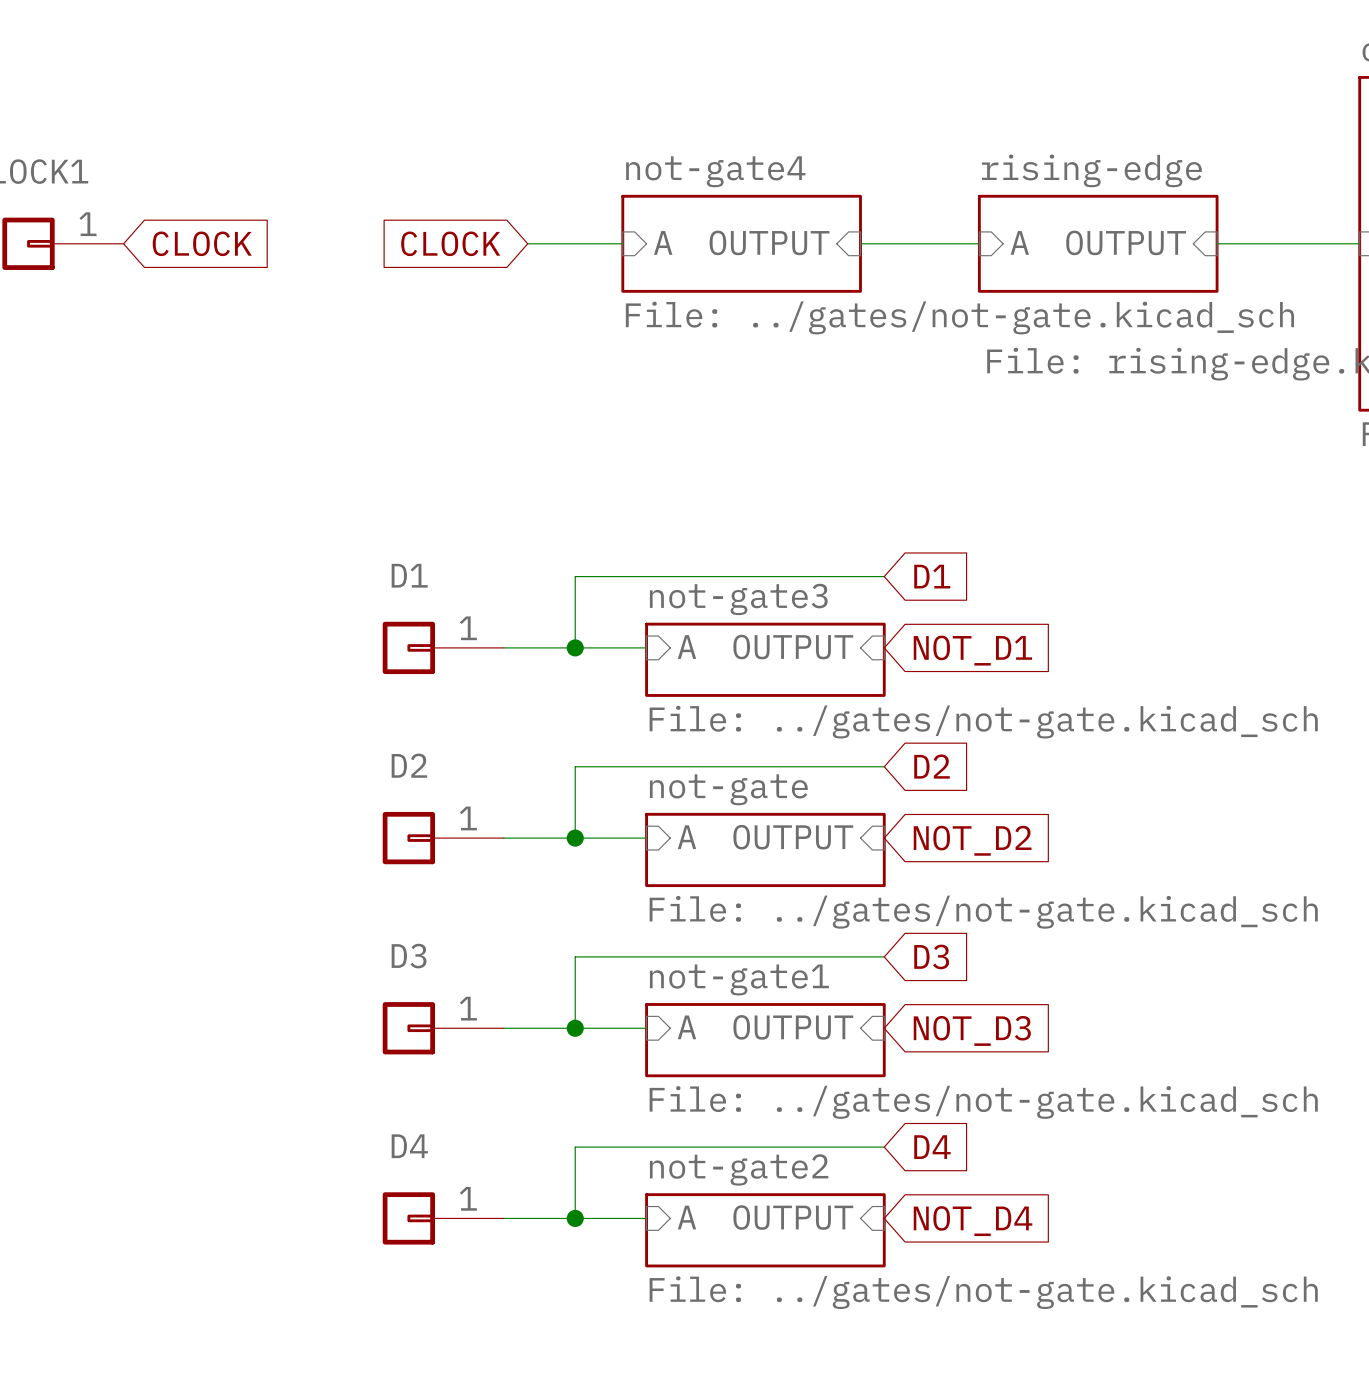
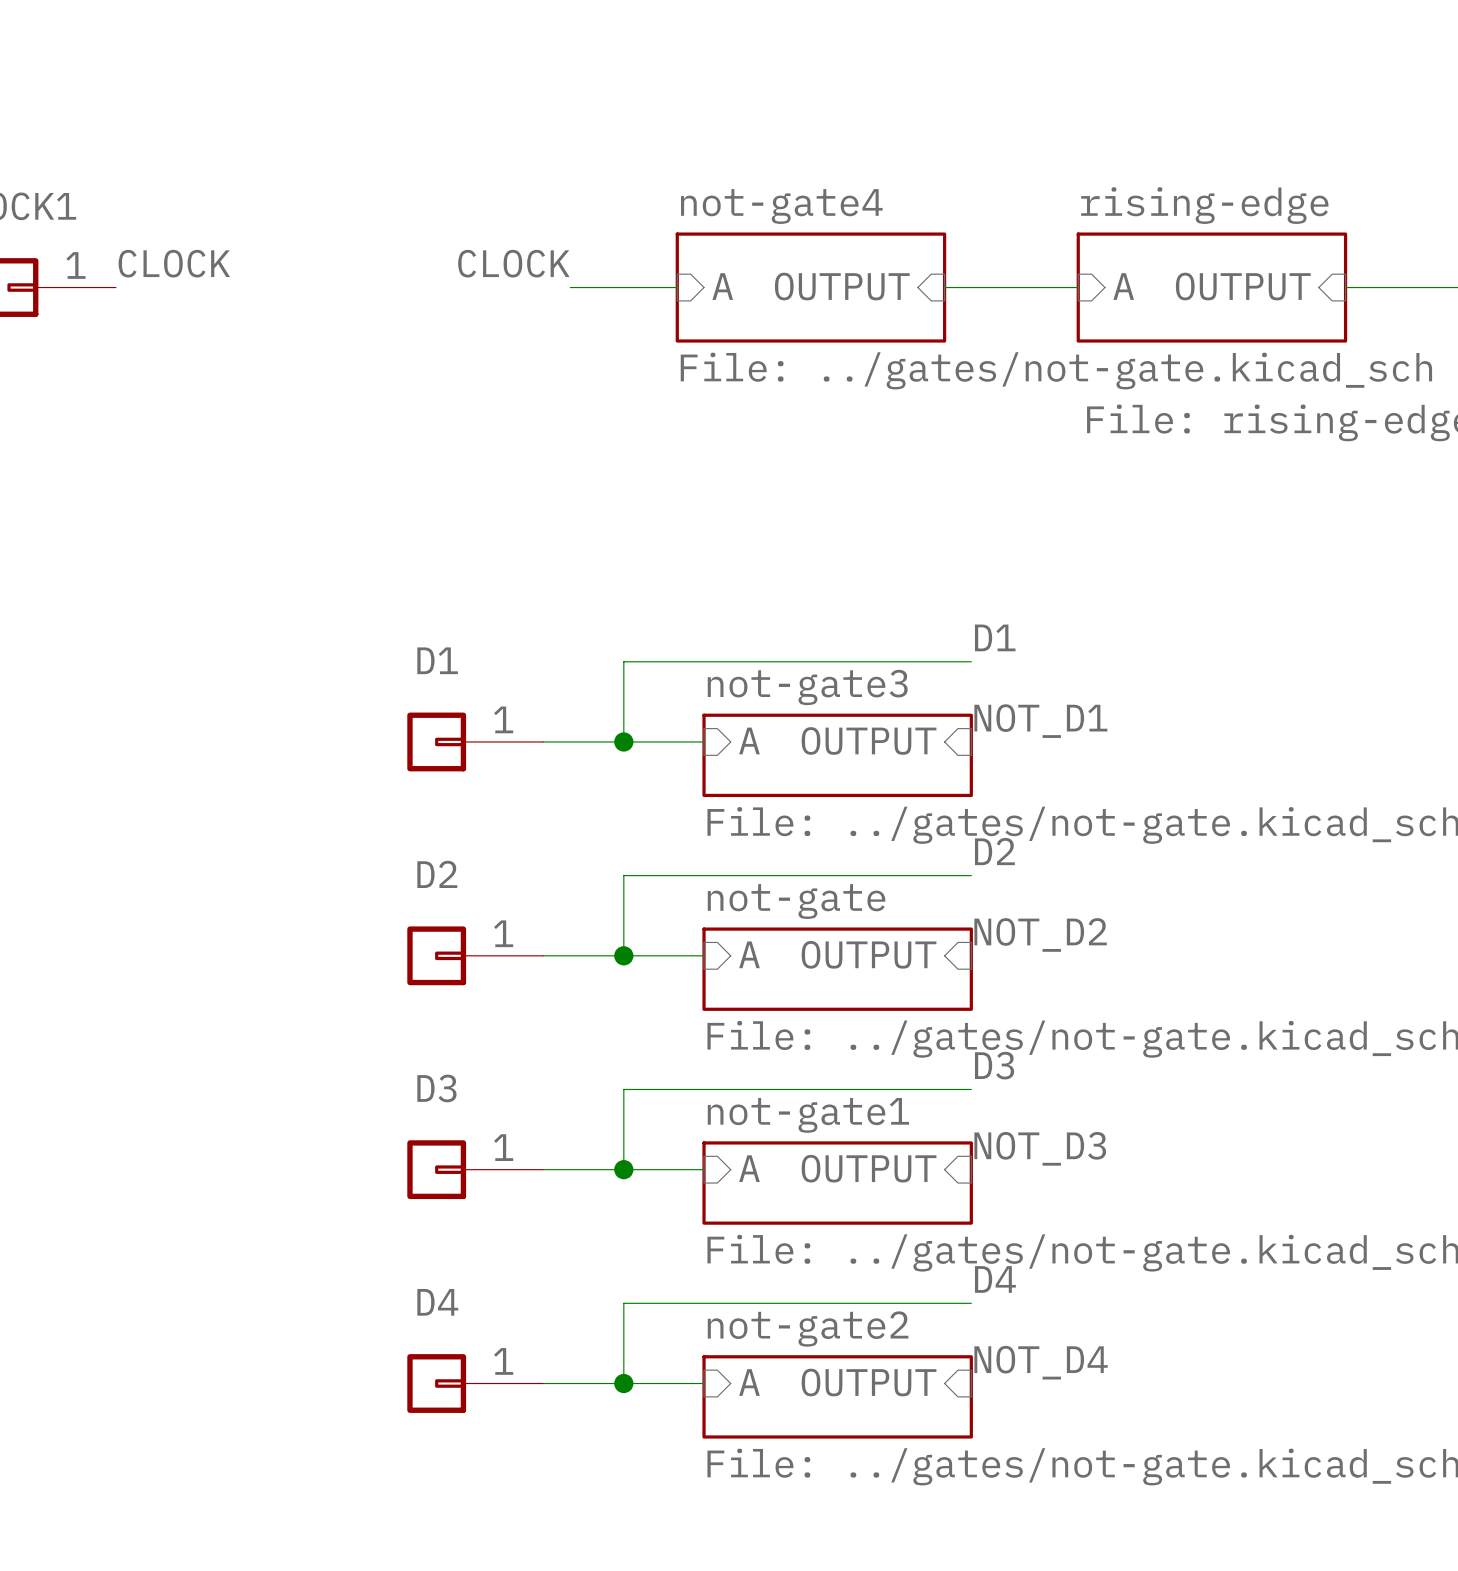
label: none -> CLOCK (174, 263)
label: none -> CLOCK (513, 263)
global label: CLOCK (202, 243) -> none
global label: CLOCK (450, 243) -> none
label: none -> D1 (995, 637)
global label: D1 (932, 576) -> none
label: none -> NOT_D1 (1040, 721)
global label: NOT_D1 (972, 650) -> none
label: none -> D2 (994, 851)
global label: D2 (932, 766) -> none
label: none -> NOT_D2 (1040, 934)
global label: NOT_D2 (972, 840) -> none
label: none -> D3 (994, 1065)
global label: D3 (931, 956) -> none
label: none -> NOT_D3 (1040, 1148)
global label: NOT_D3 (972, 1030) -> none
label: none -> D4 (995, 1279)
global label: D4 (932, 1147) -> none
label: none -> NOT_D4 (1041, 1362)
global label: NOT_D4 (973, 1221) -> none

